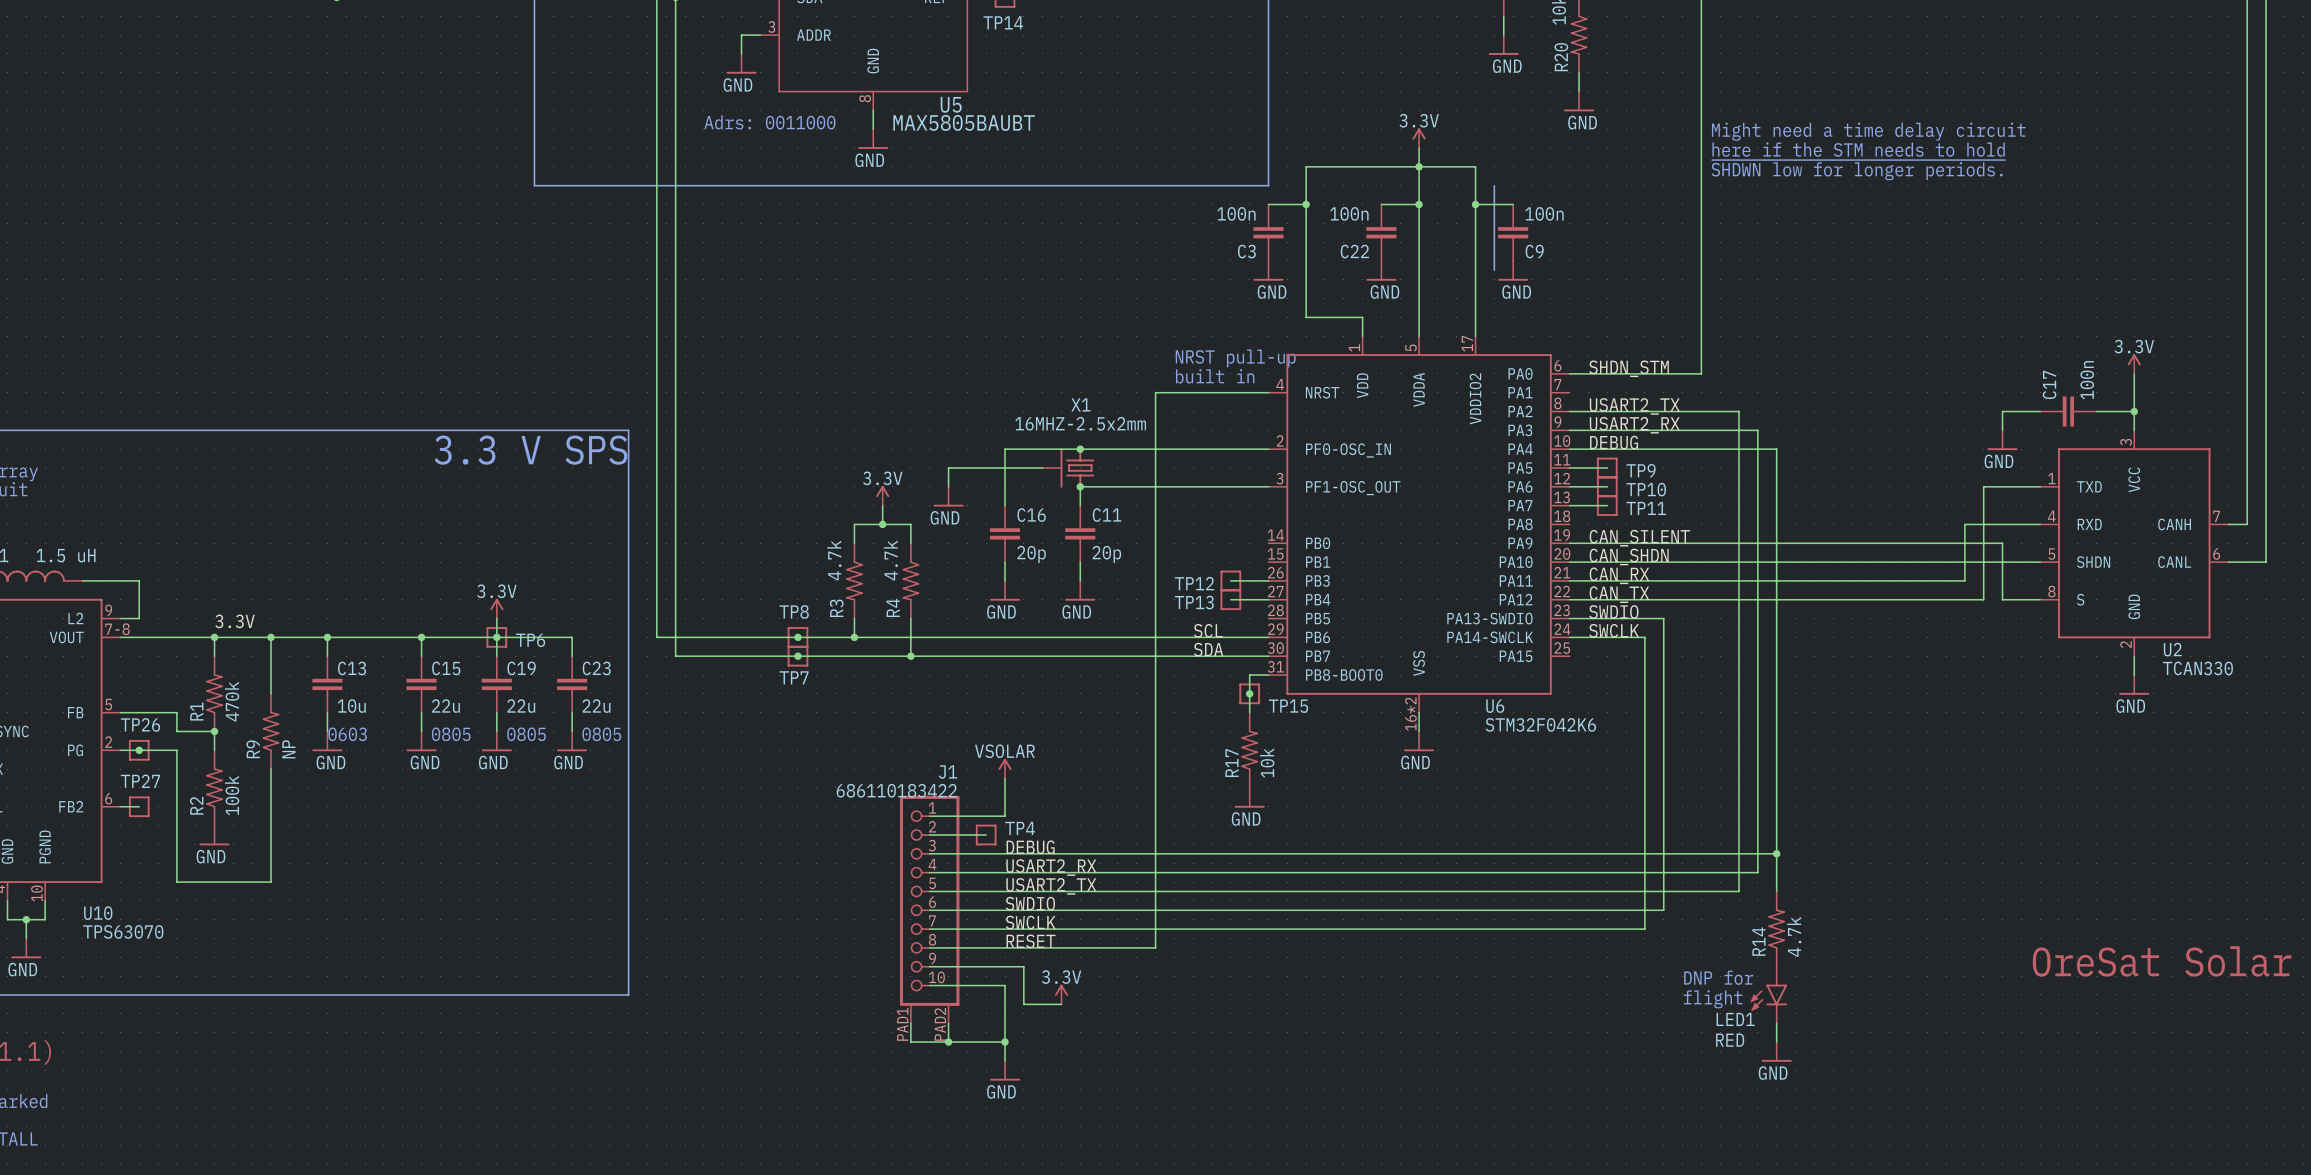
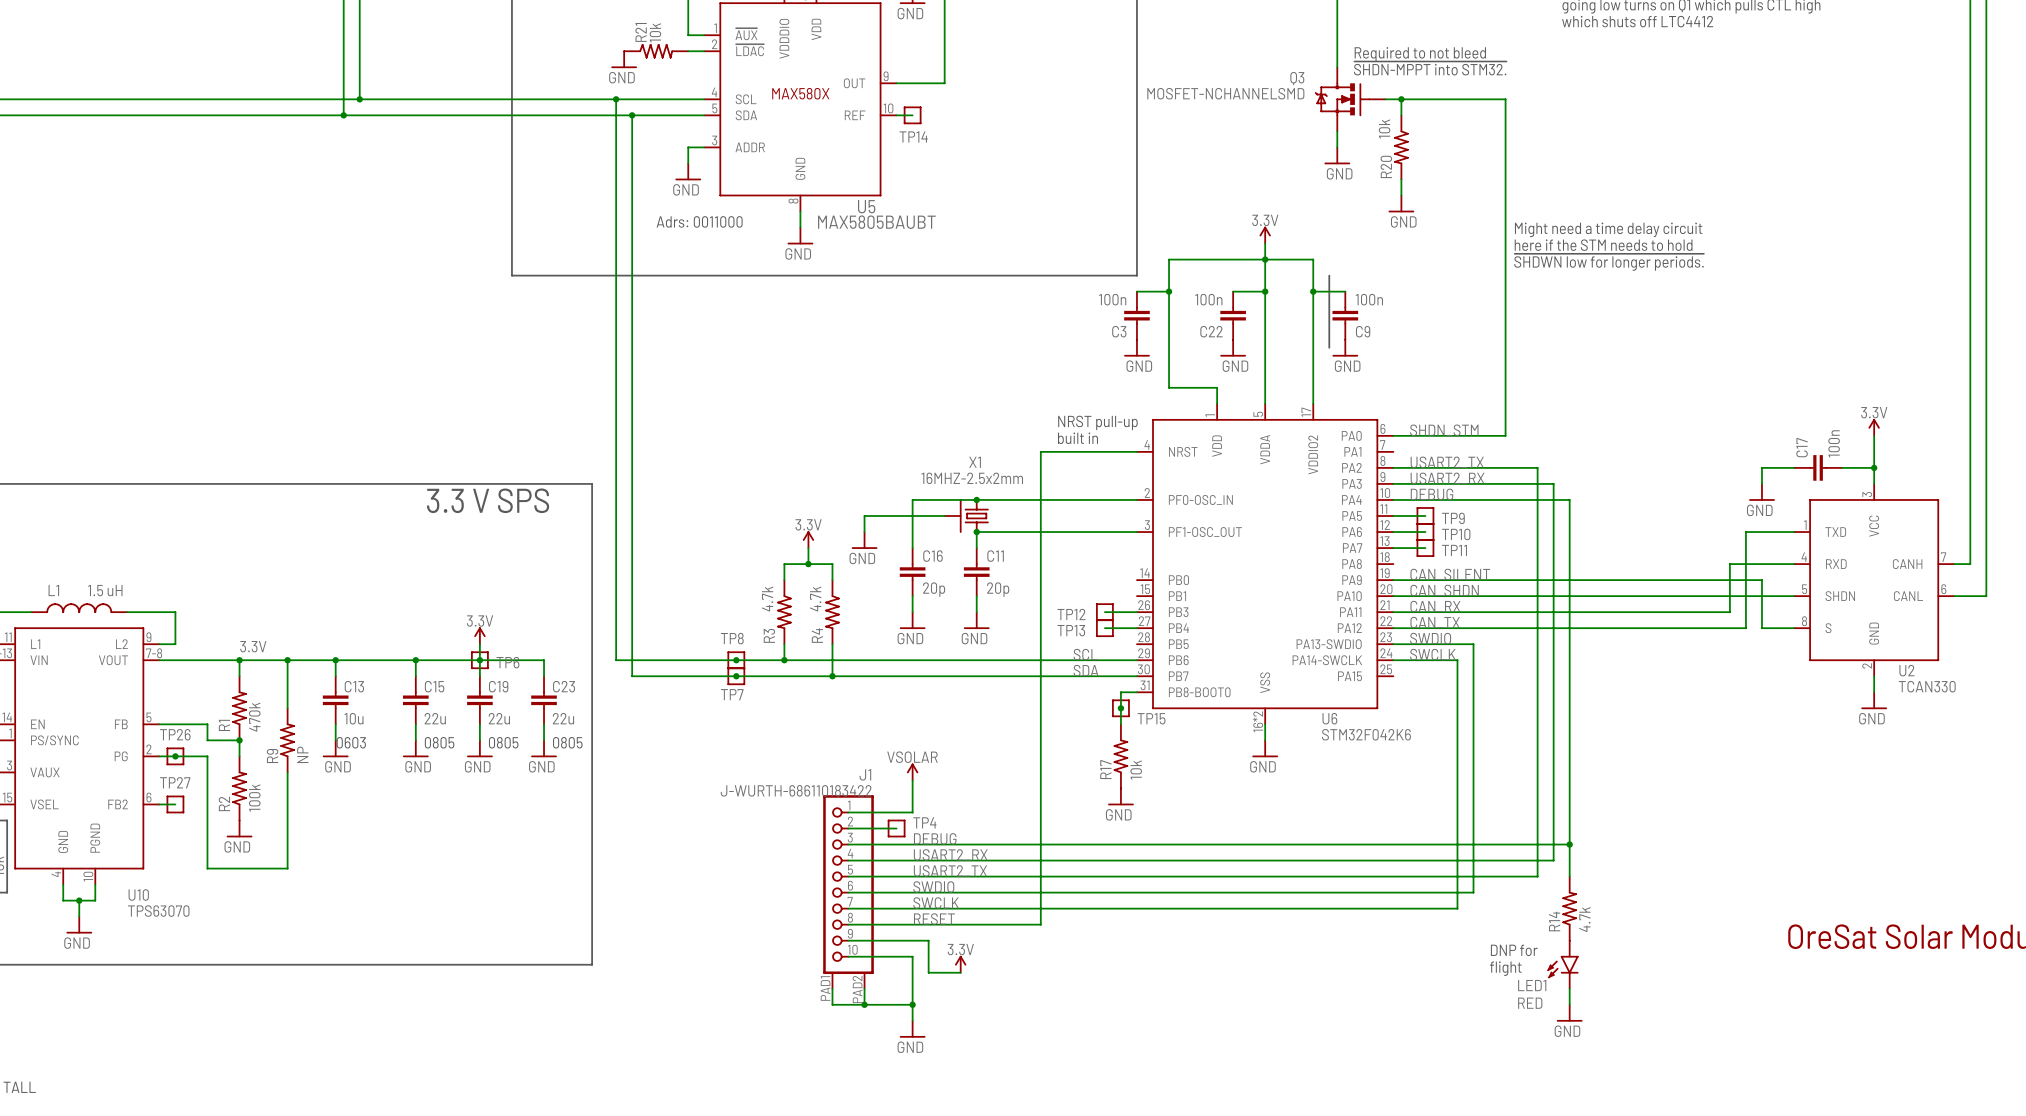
J1 value: 686110183422 (896, 790) -> J-WURTH-686110183422 (796, 790)

